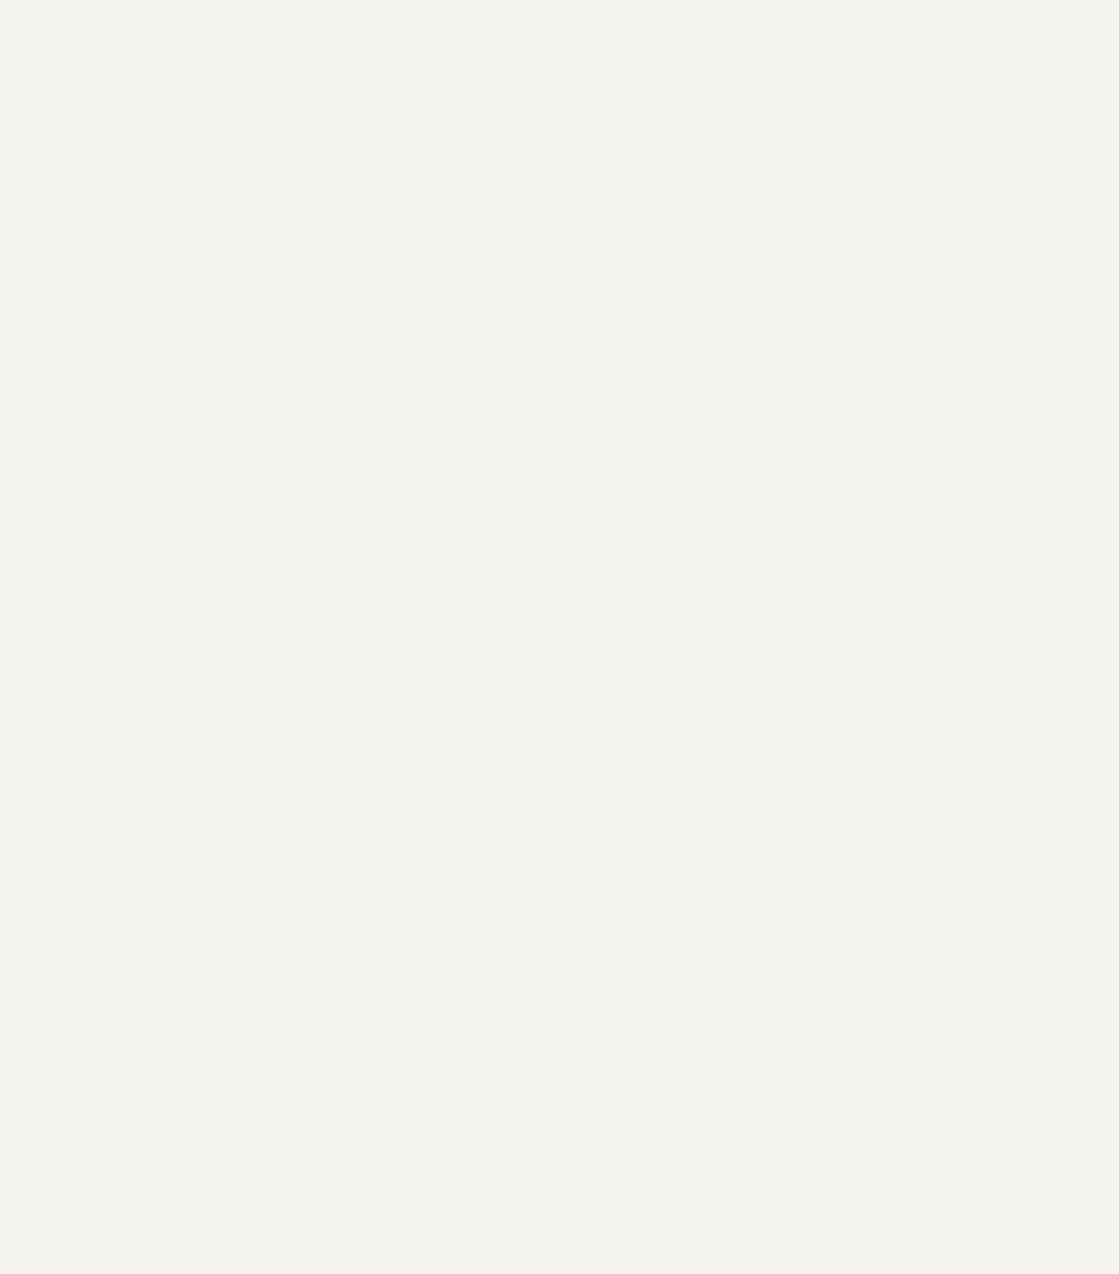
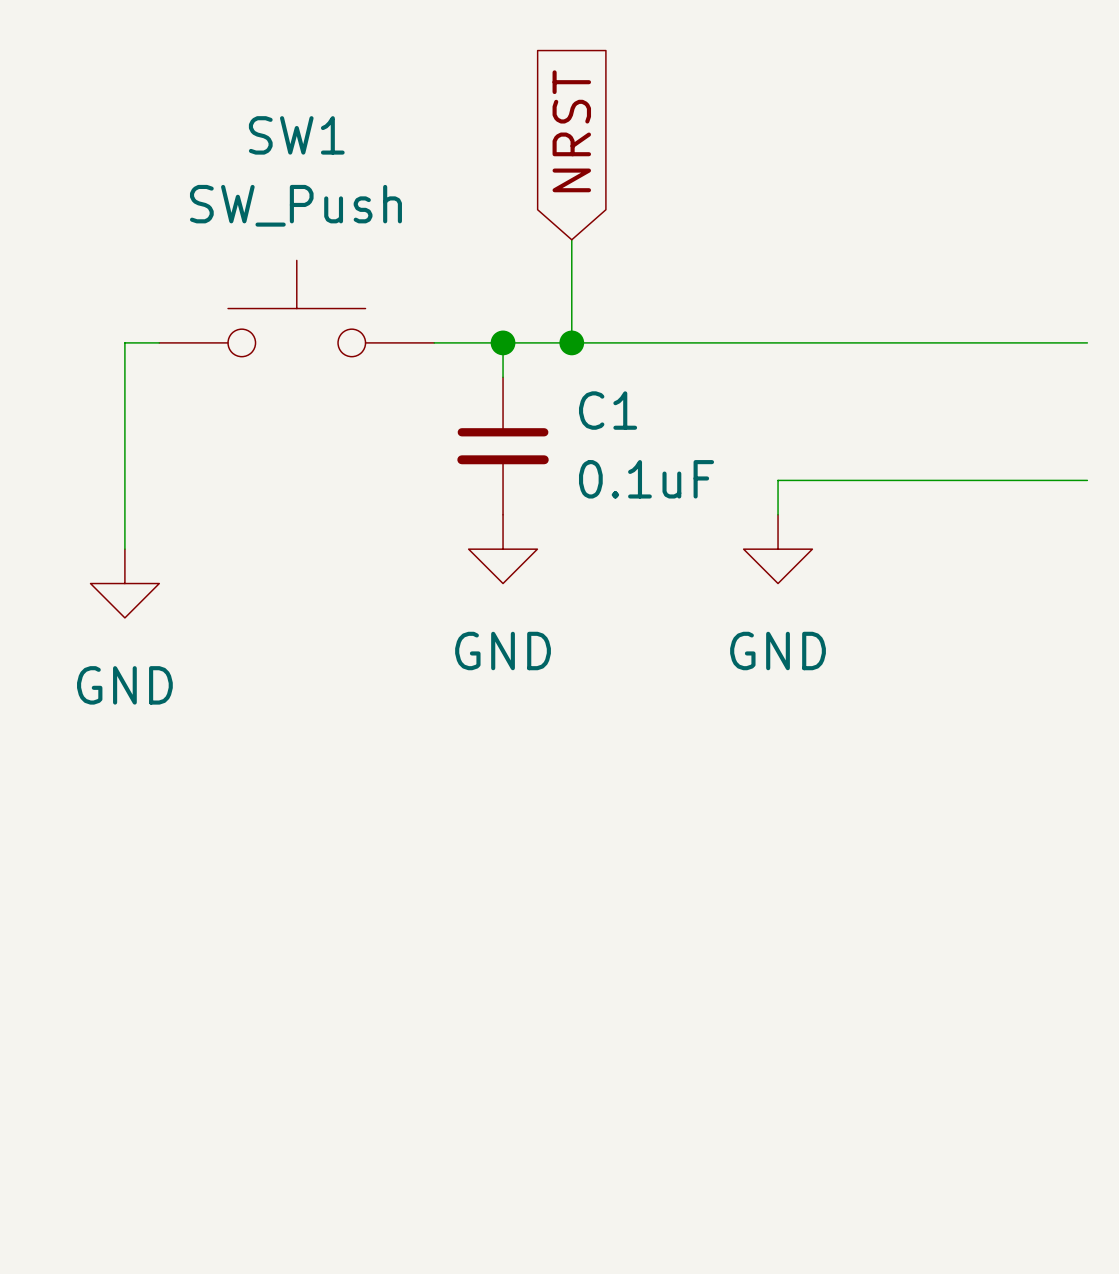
global label: none -> NRST (571, 131)
wire: none -> (571, 239) (571, 342)
SW1: none -> SW_Push (296, 308)
wire: none -> (159, 342) (124, 342) (124, 549)
wire: none -> (434, 342) (1087, 342)
wire: none -> (503, 342) (503, 377)
junction: none -> (503, 342)
junction: none -> (571, 342)
C1: none -> 0.1uF (503, 446)
wire: none -> (1087, 480) (778, 480) (778, 514)
power symbol: none -> GND (503, 549)
power symbol: none -> GND (778, 549)
power symbol: none -> GND (124, 583)

